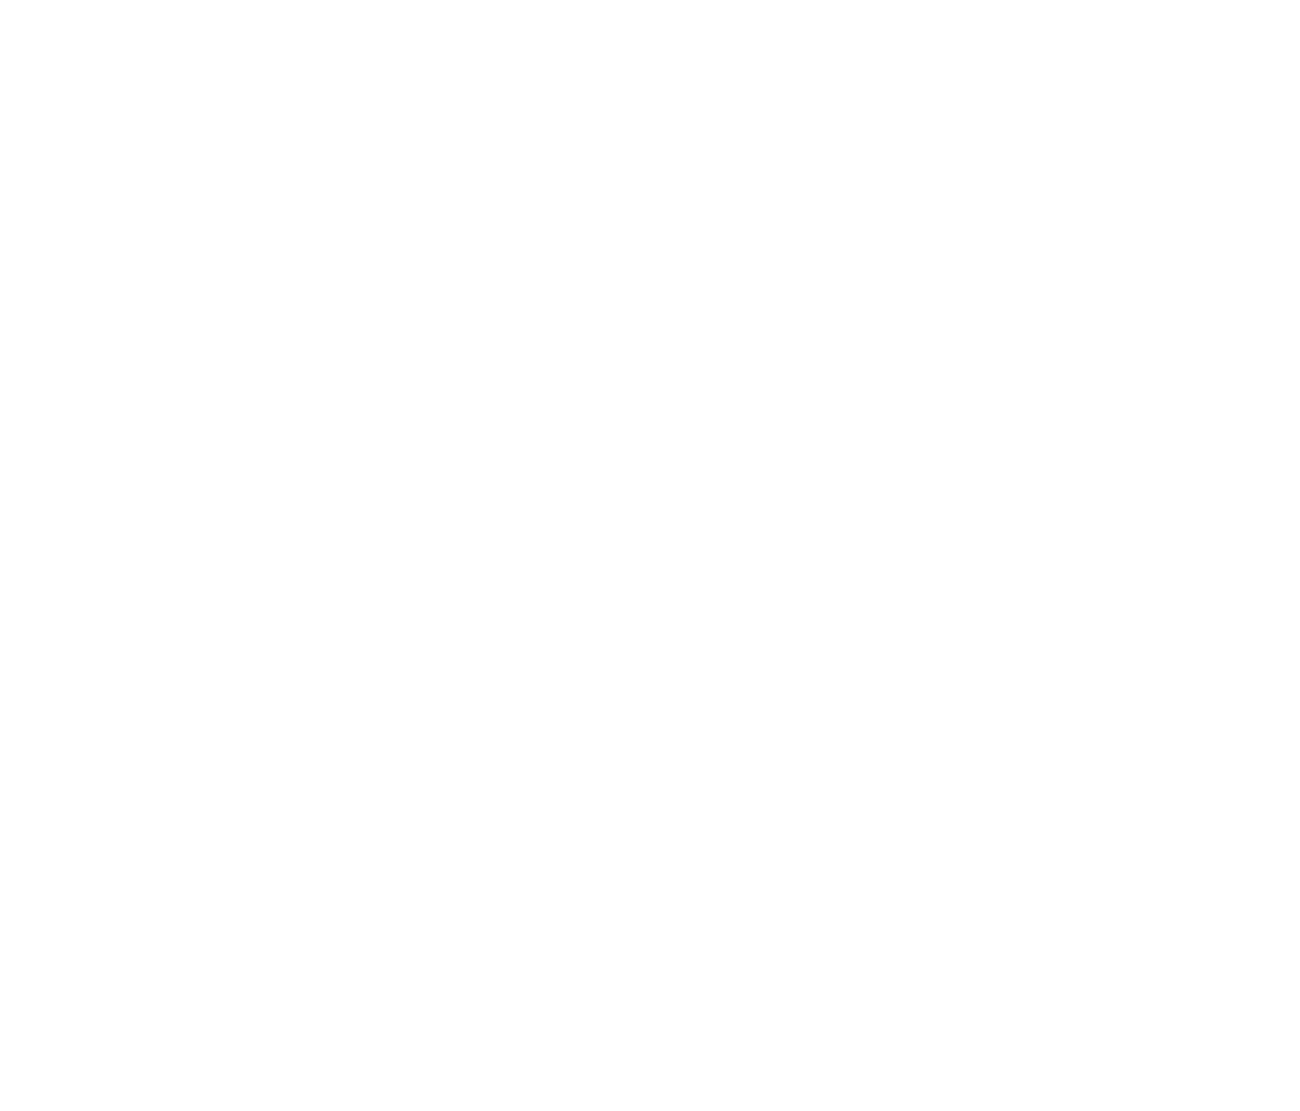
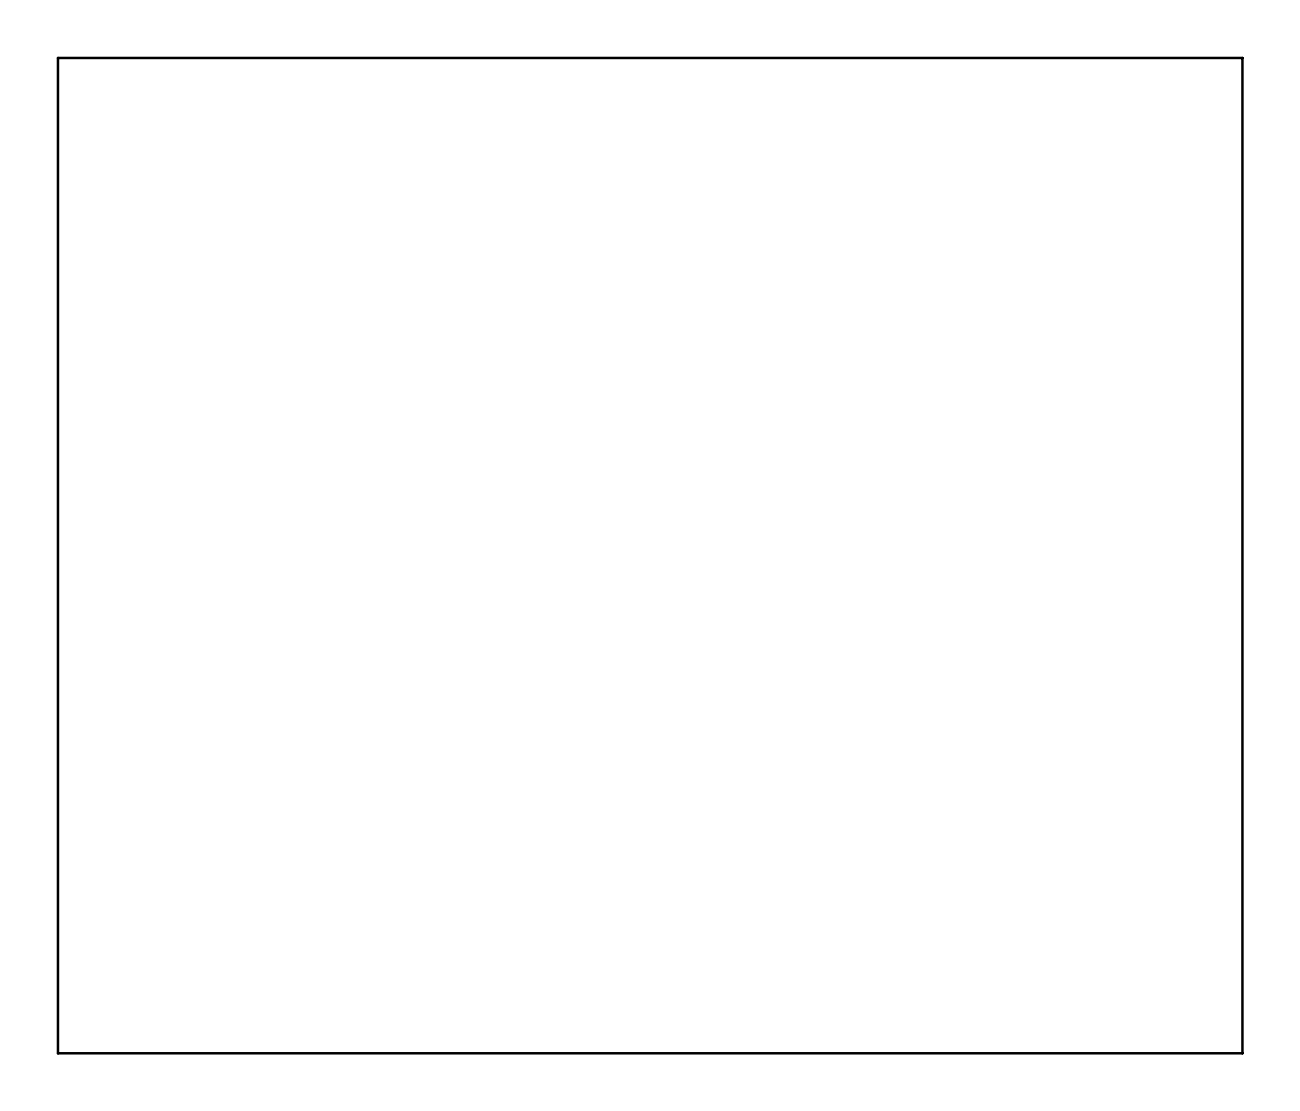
board edge: none -> (1242, 57) (57, 57) (57, 1053) (1242, 1053) (1242, 57)

